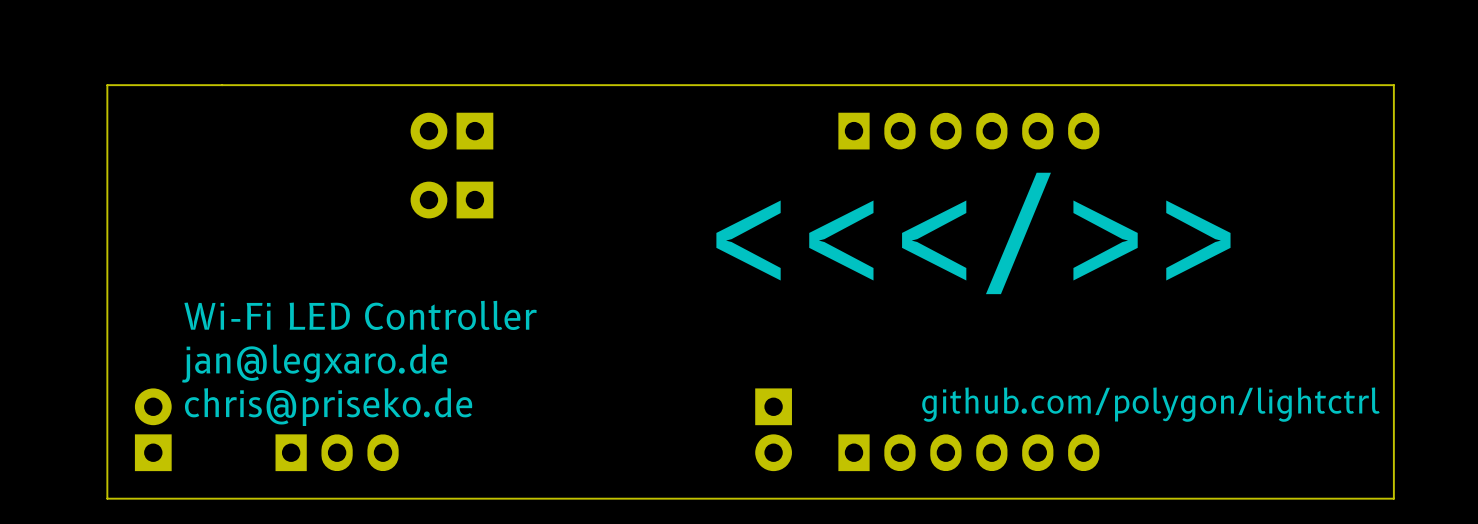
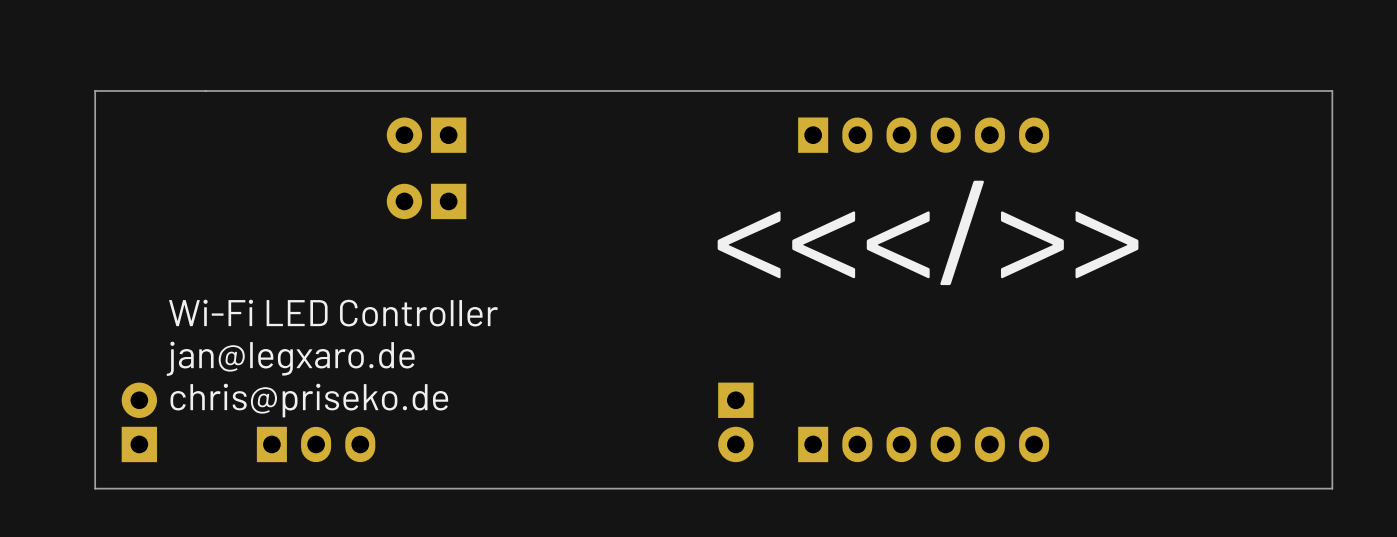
text: github.com/polygon/lightctrl (1150, 404) -> none

